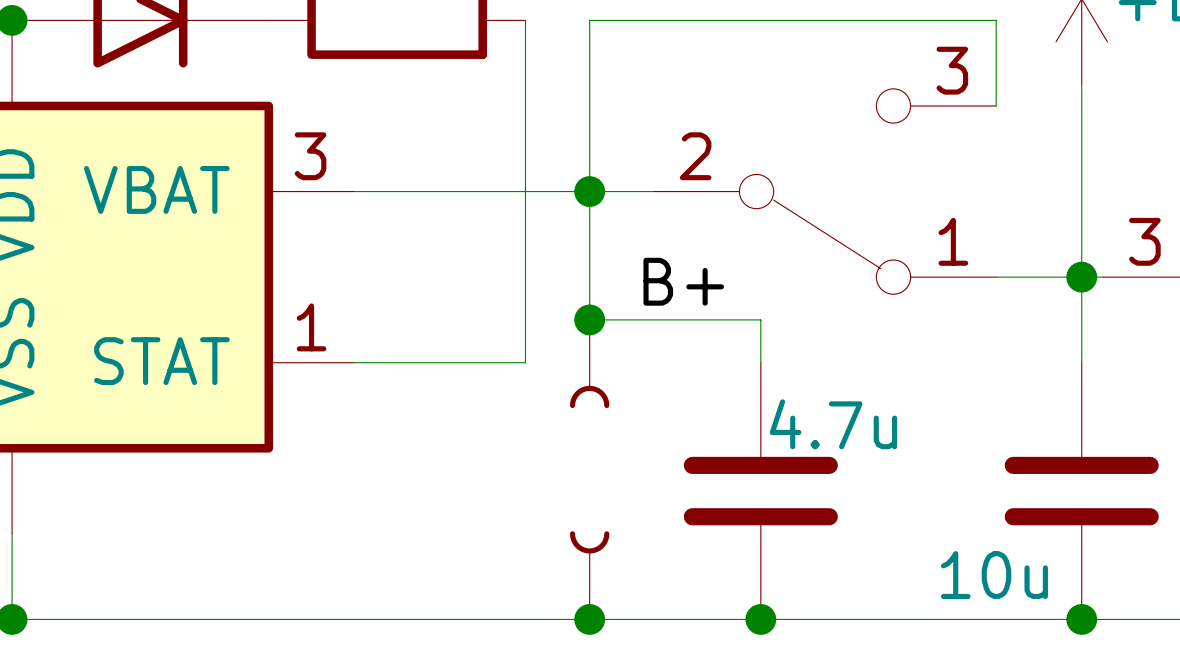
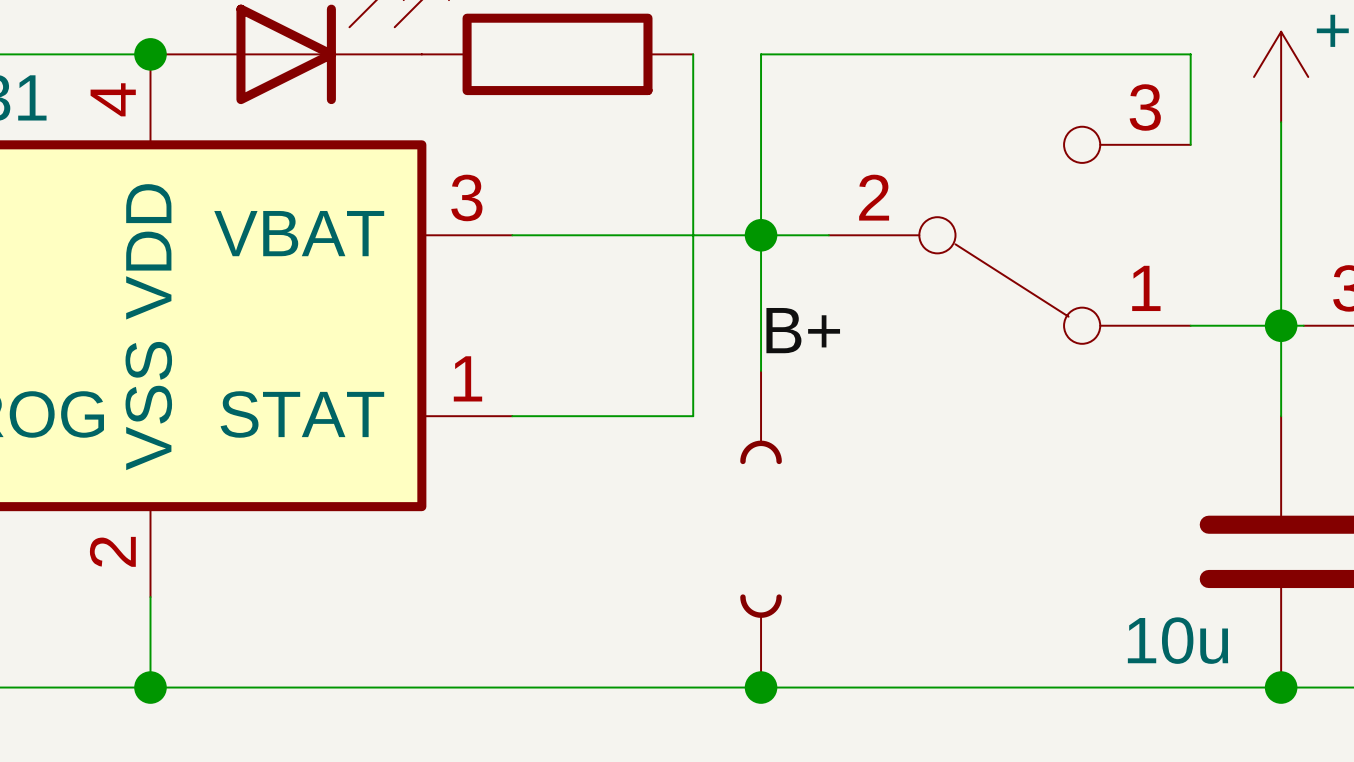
label position: B+ (683, 281) -> B+ (803, 330)
wire: (589, 319) (760, 319) (760, 362) -> none
junction: (589, 319) -> none
part: 4.7u (760, 491) -> none
junction: (760, 619) -> none

